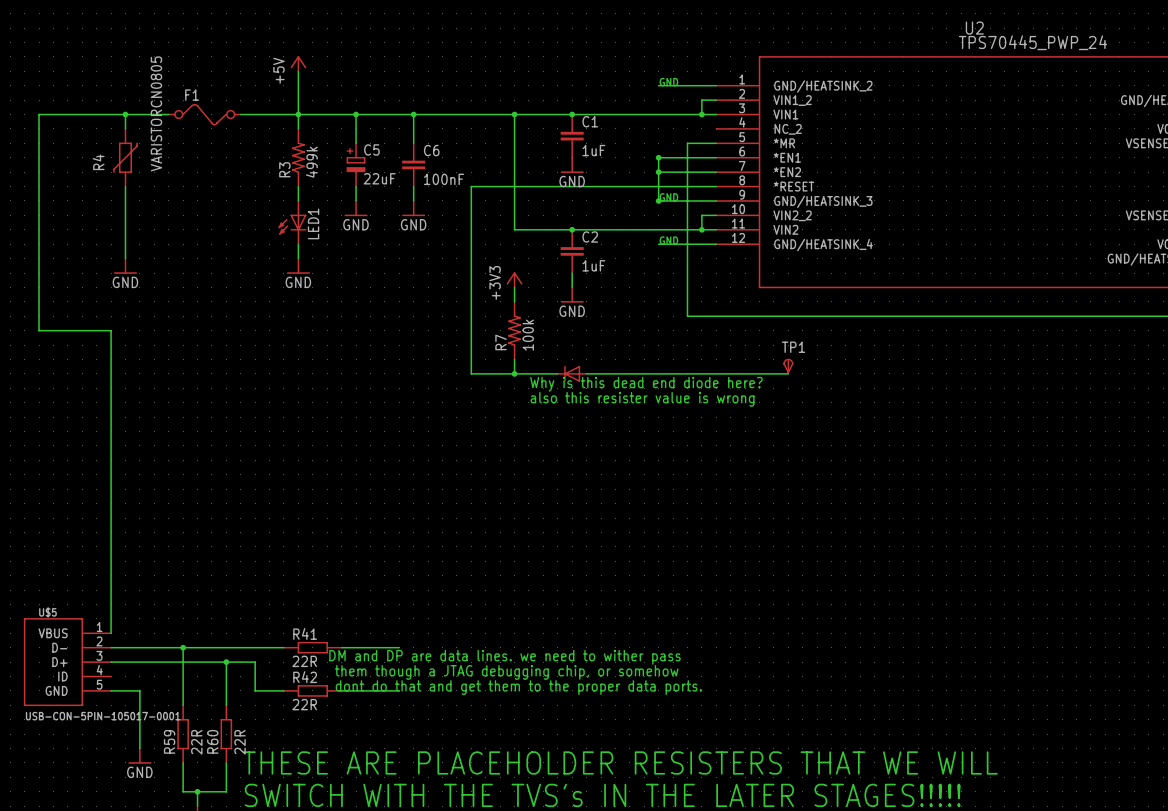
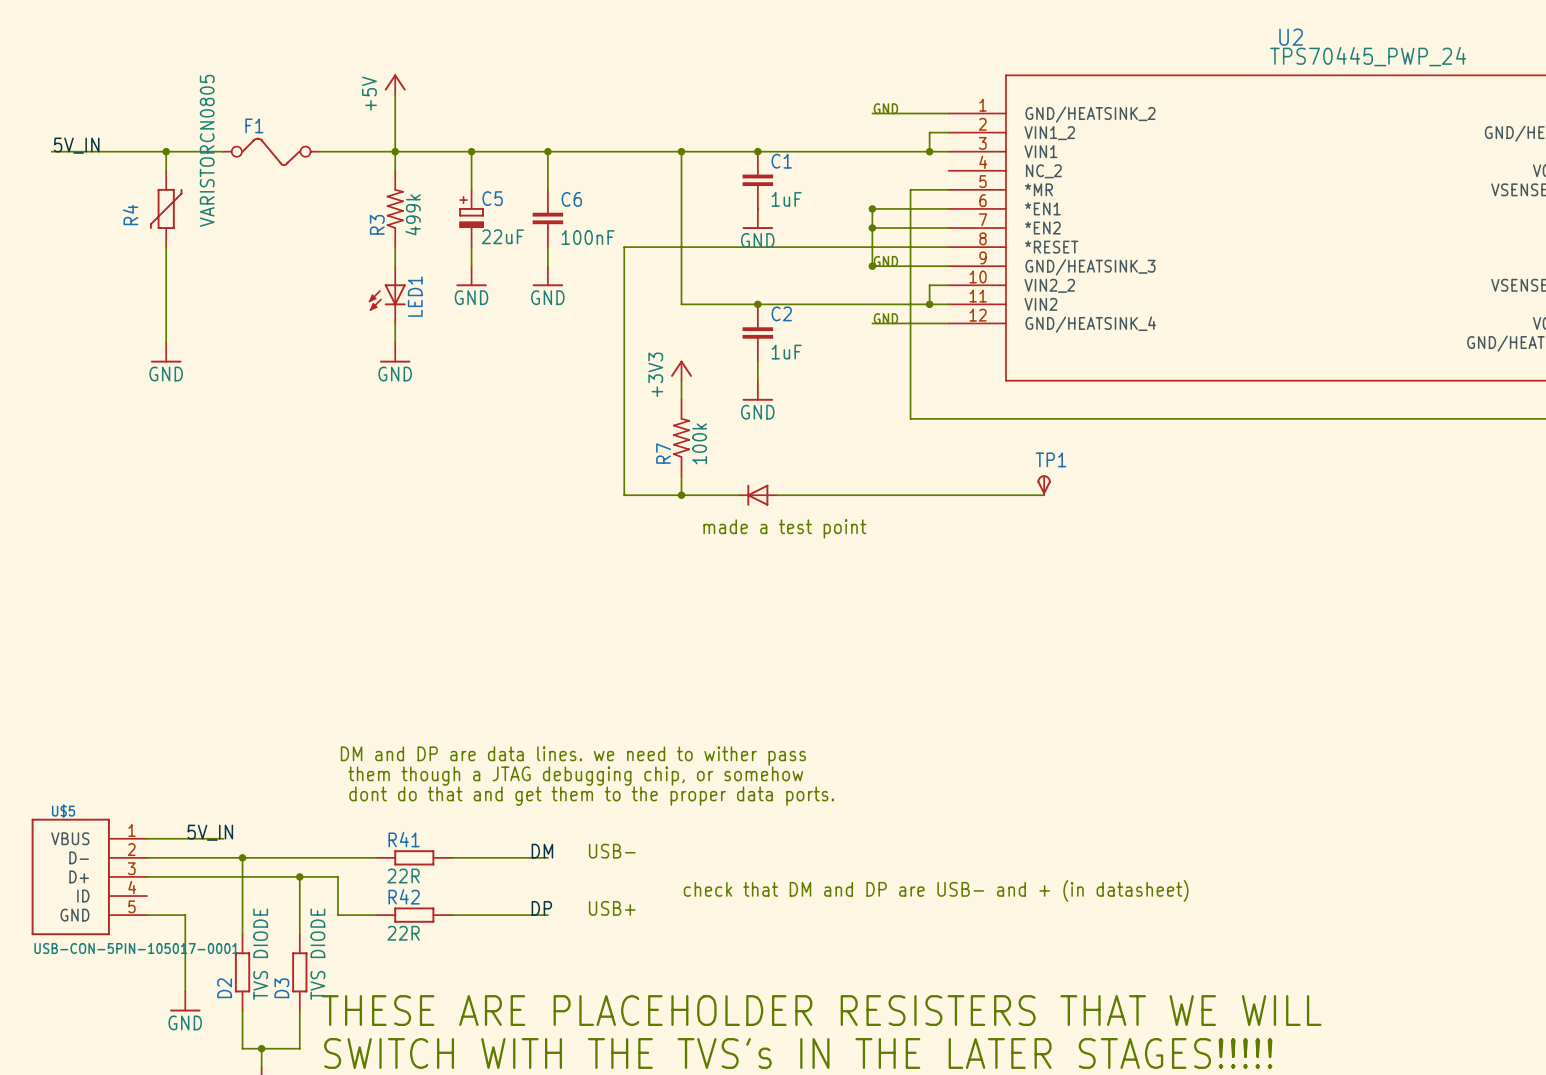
label: none -> 5V_IN (76, 145)
wire: (39, 114) (39, 330) (111, 330) (111, 633) -> (223, 838) (147, 838)
text: Why is this dead end diode here? (646, 384) -> none
text: also this resister value is wrong (642, 399) -> made a test point (784, 528)
label: none -> 5V_IN (210, 832)
label: none -> DM (542, 851)
text: none -> USB- (612, 851)
wire: none -> (528, 857) (547, 857)
text position: DM and DP are data lines. we need to wither pass (504, 657) -> DM and DP are data lines. we need to wither pass (573, 756)
text position: them though a JTAG debugging chip, or somehow (506, 672) -> them though a JTAG debugging chip, or somehow (575, 776)
text: none -> check that DM and DP are USB- and + (in datasheet) (936, 890)
label: none -> DP (541, 908)
text: none -> USB+ (612, 908)
text position: dont do that and get them to the proper data ports. (518, 687) -> dont do that and get them to the proper data ports. (591, 796)
wire: none -> (528, 915) (547, 915)
R59 name: R59 (169, 741) -> D2 (224, 988)
R60 name: R60 (212, 741) -> D3 (281, 988)
R59 value: 22R (196, 742) -> TVS DIODE (260, 954)
R60 value: 22R (240, 742) -> TVS DIODE (317, 954)

